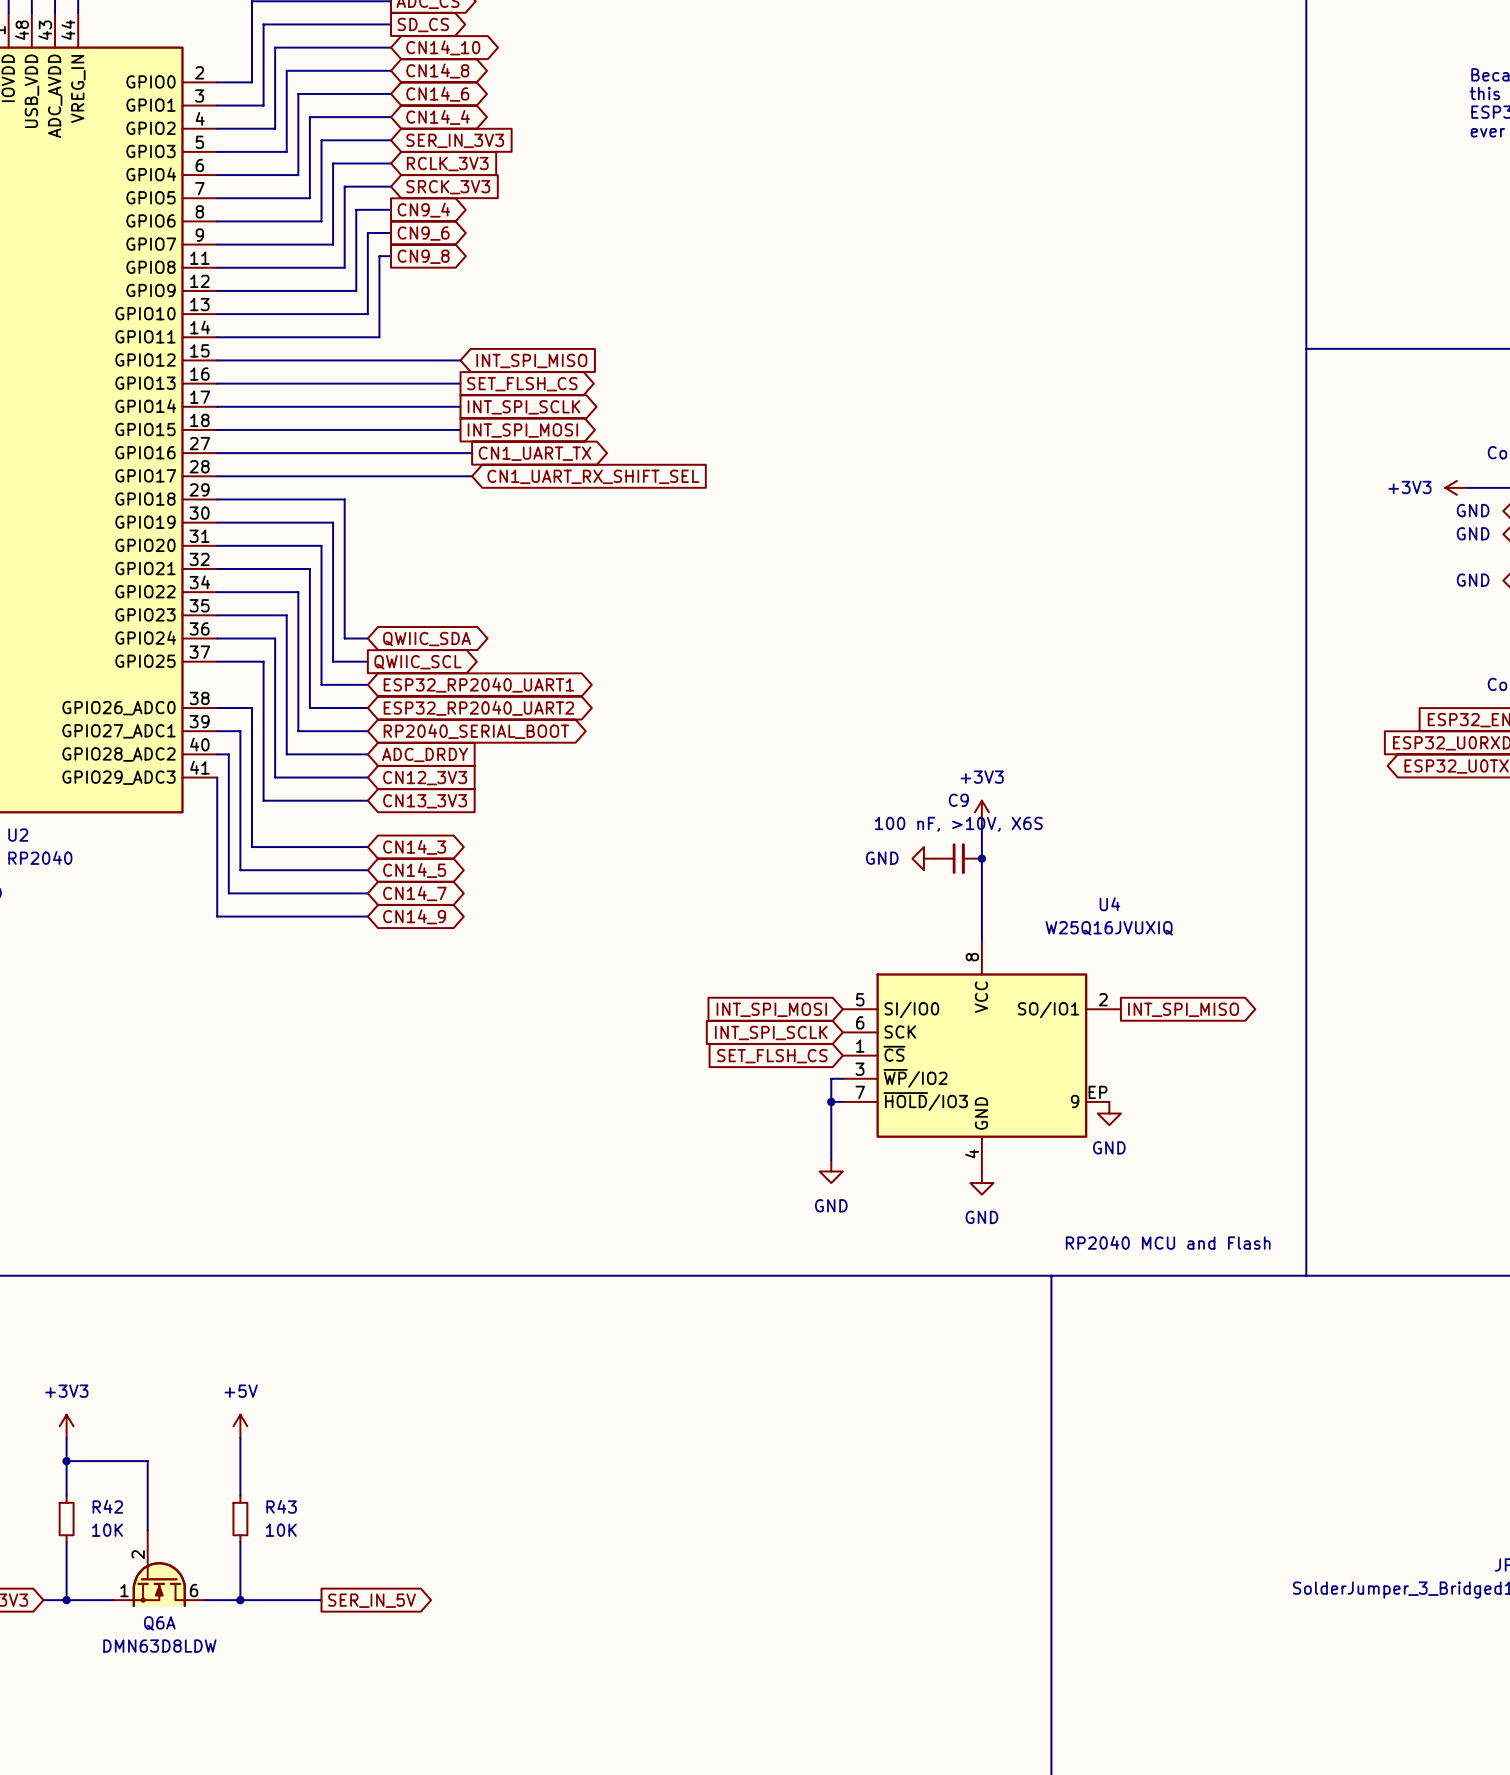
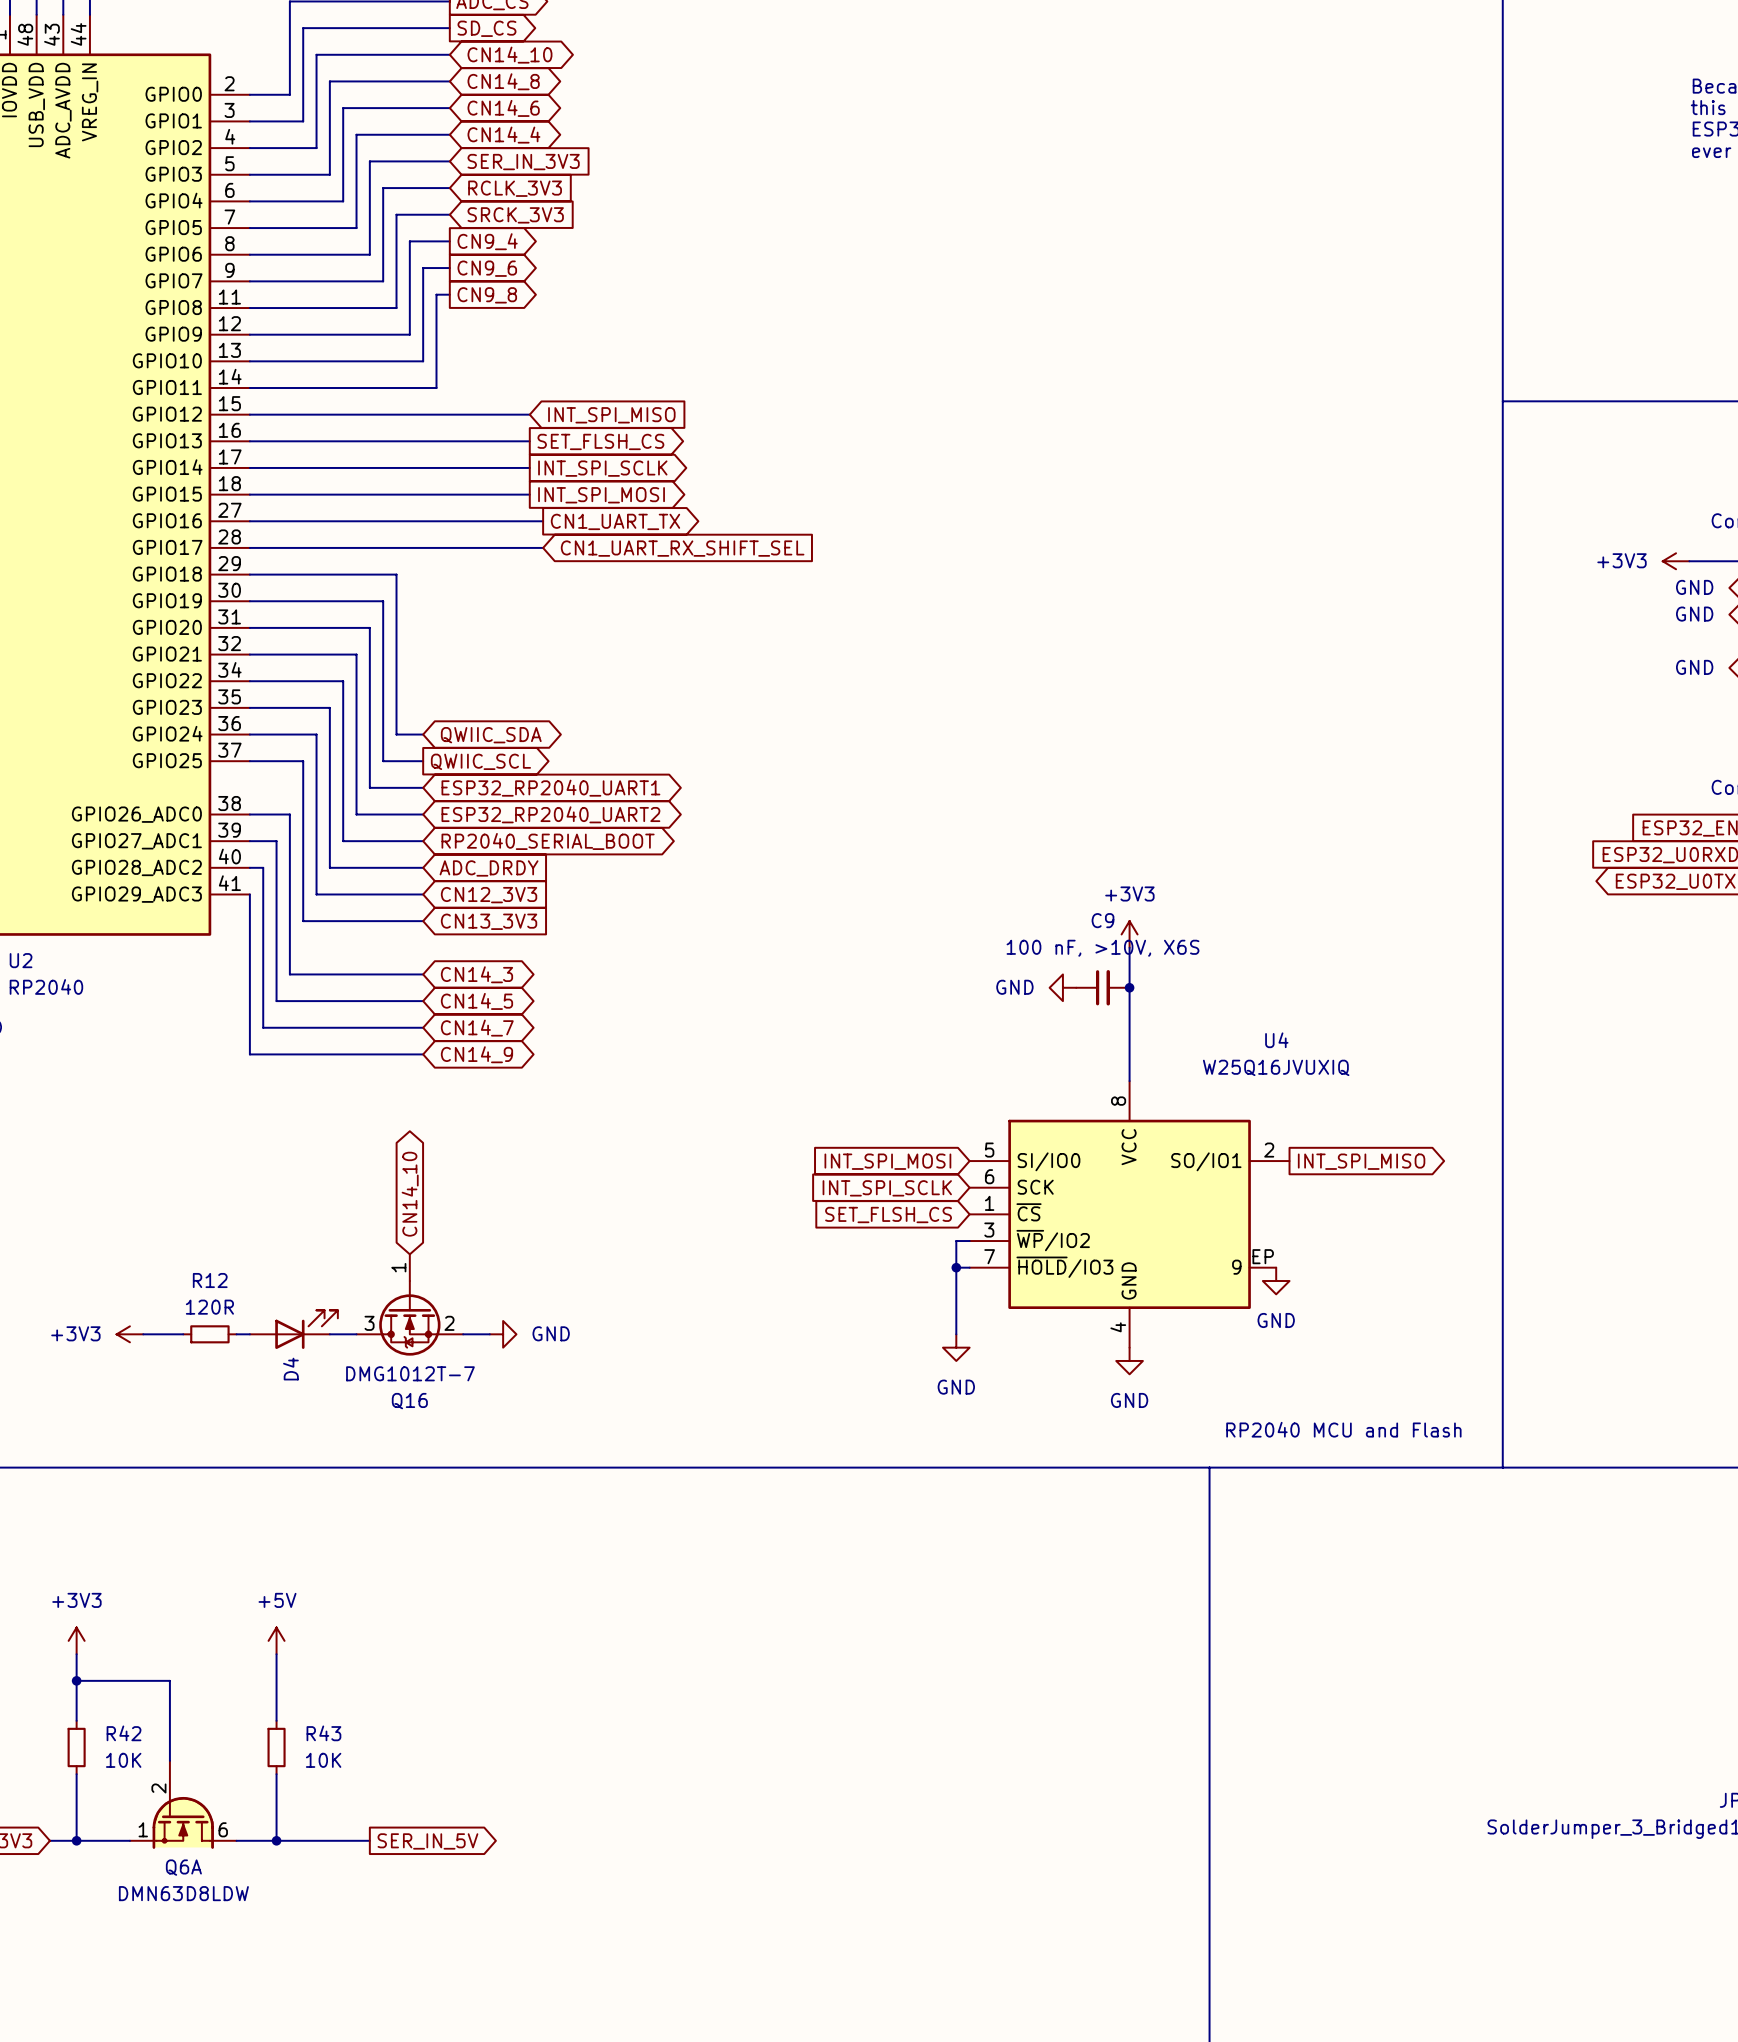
global label: none -> CN14_10 (410, 1194)
Q16: none -> DMG1012T-7 (409, 1305)
D4: none -> (293, 1329)
power symbol: none -> +3V3 (129, 1334)
wire: none -> (143, 1334) (183, 1334)
R12: none -> 120R (209, 1334)
wire: none -> (236, 1334) (249, 1334)
wire: none -> (329, 1334) (356, 1334)
wire: none -> (463, 1334) (489, 1334)
power symbol: none -> GND (503, 1334)

